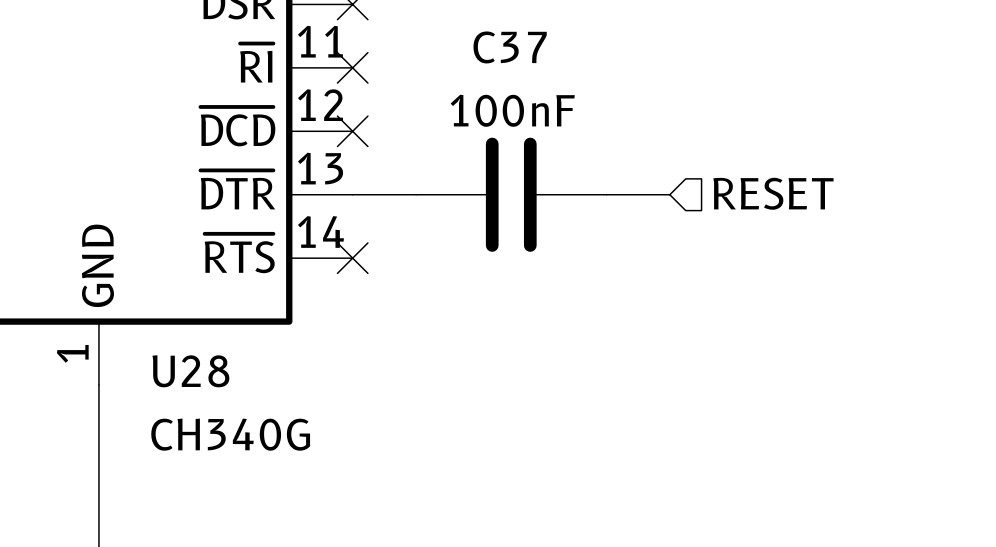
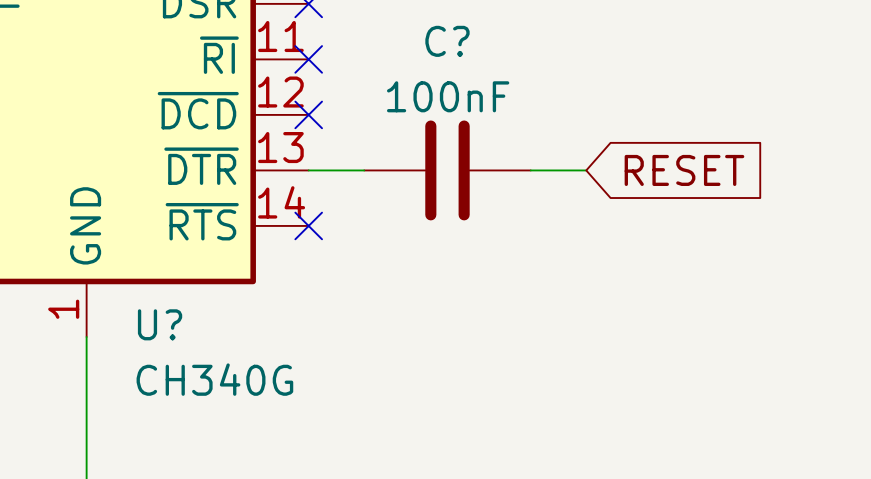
C37 name: C37 (510, 47) -> C? (447, 41)
hierarchical label: RESET (773, 193) -> none
global label: none -> RESET (684, 170)
U28 name: U28 (190, 371) -> U? (160, 324)

